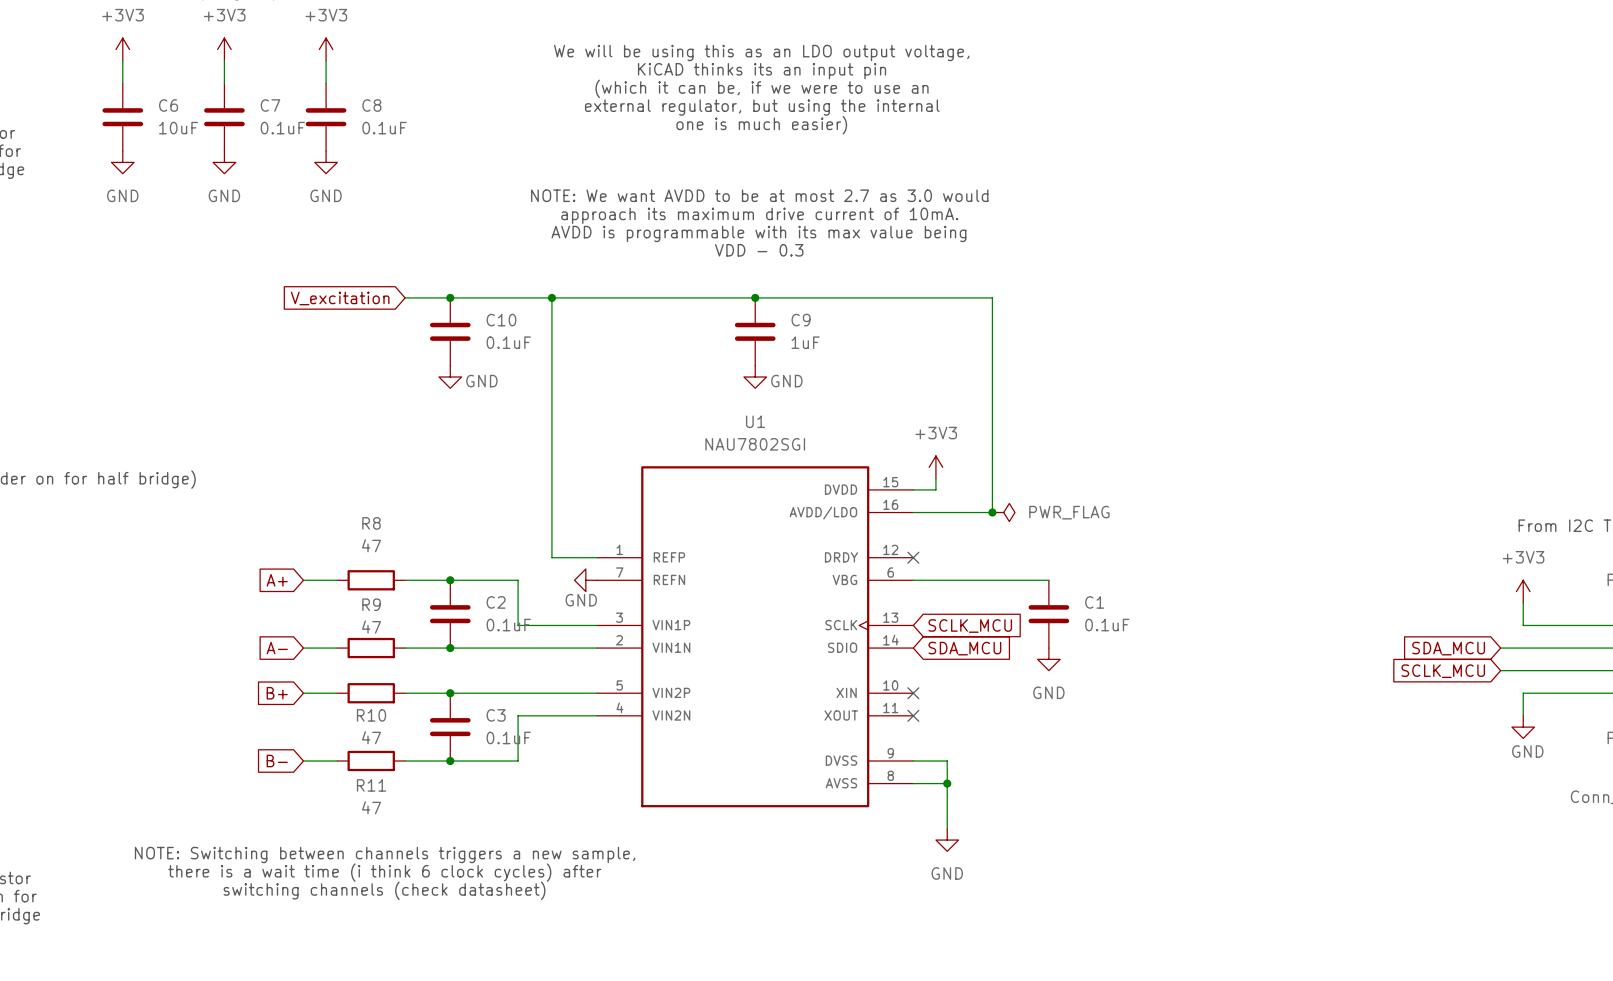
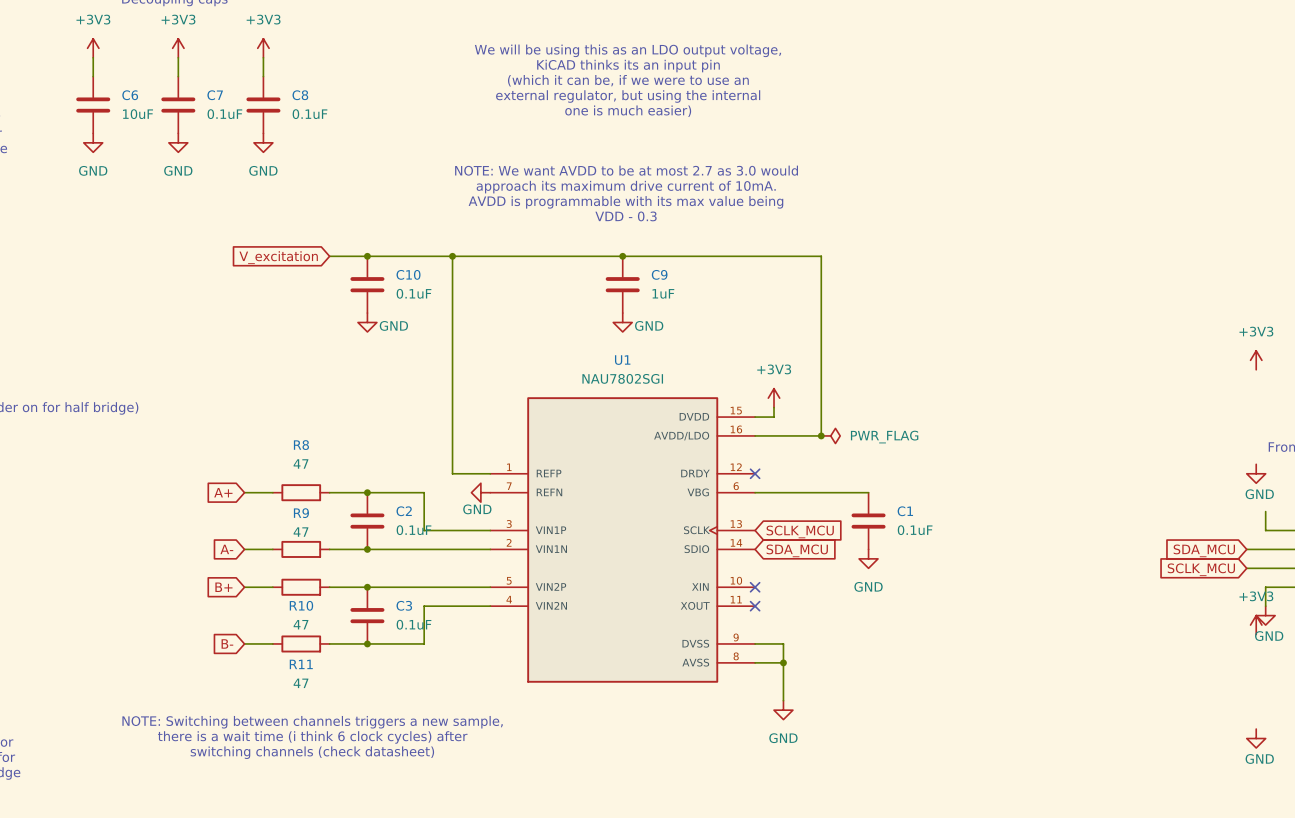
power symbol: none -> +3V3 (1256, 360)
power symbol: none -> GND (1256, 473)
power symbol: +3V3 (1523, 591) -> none
power symbol: none -> +3V3 (1256, 625)
power symbol: none -> GND (1256, 738)

